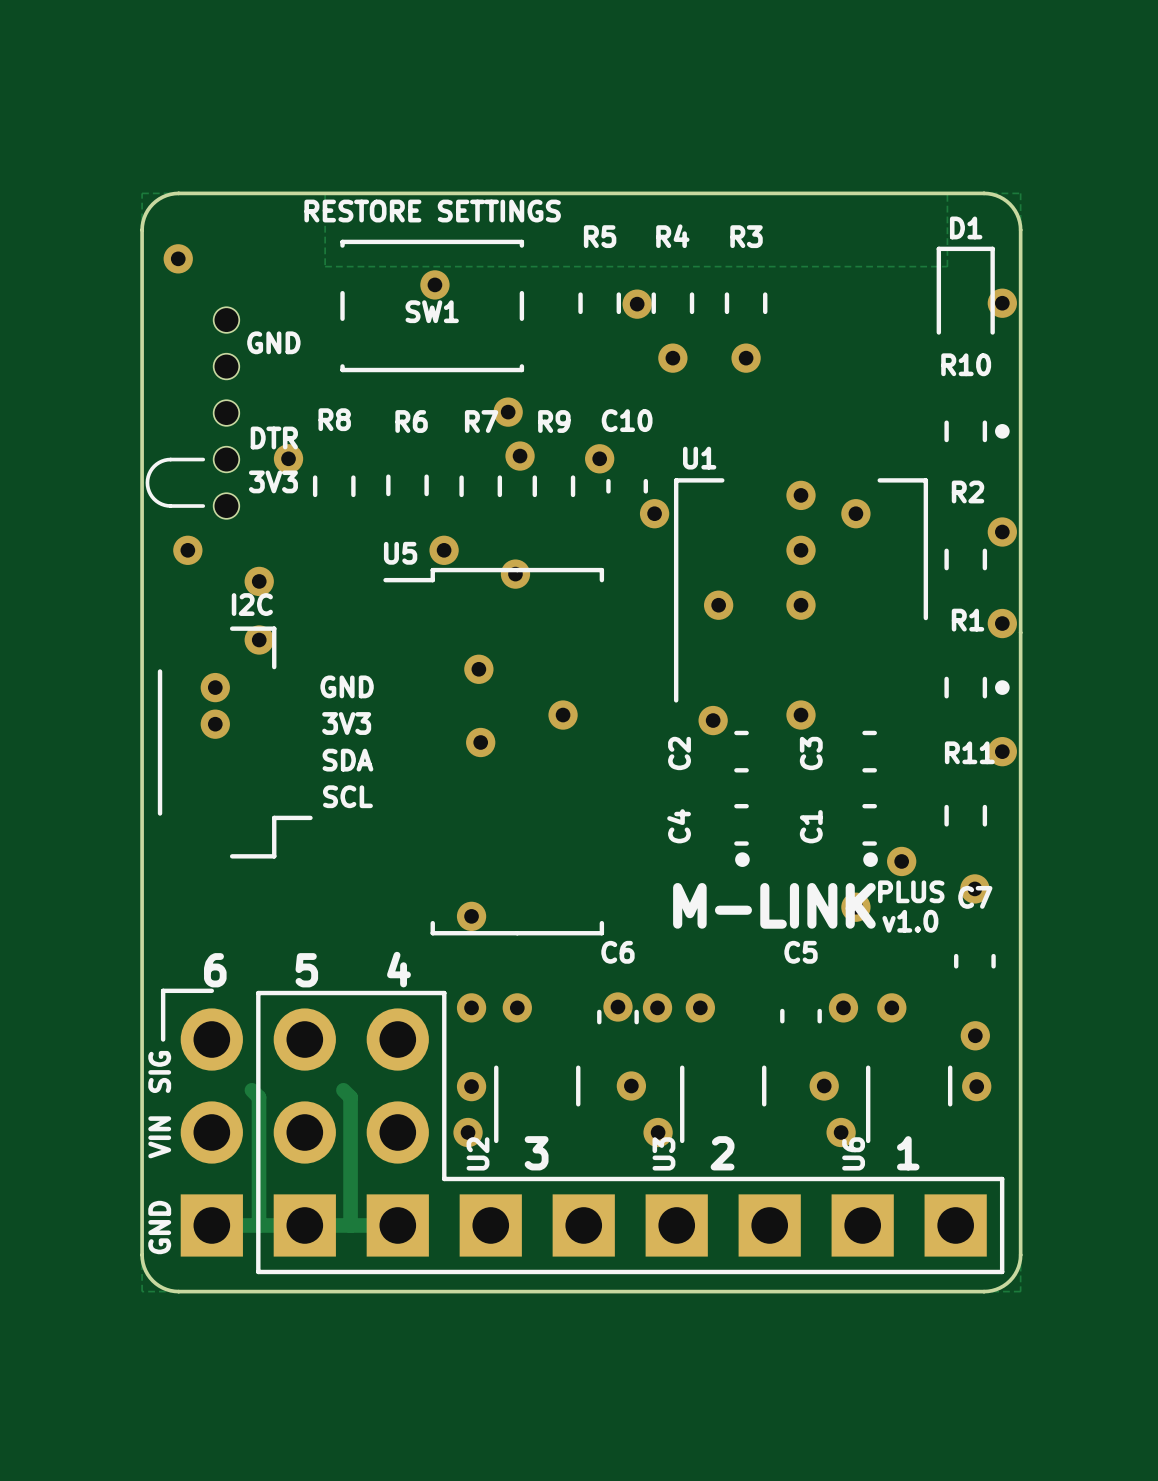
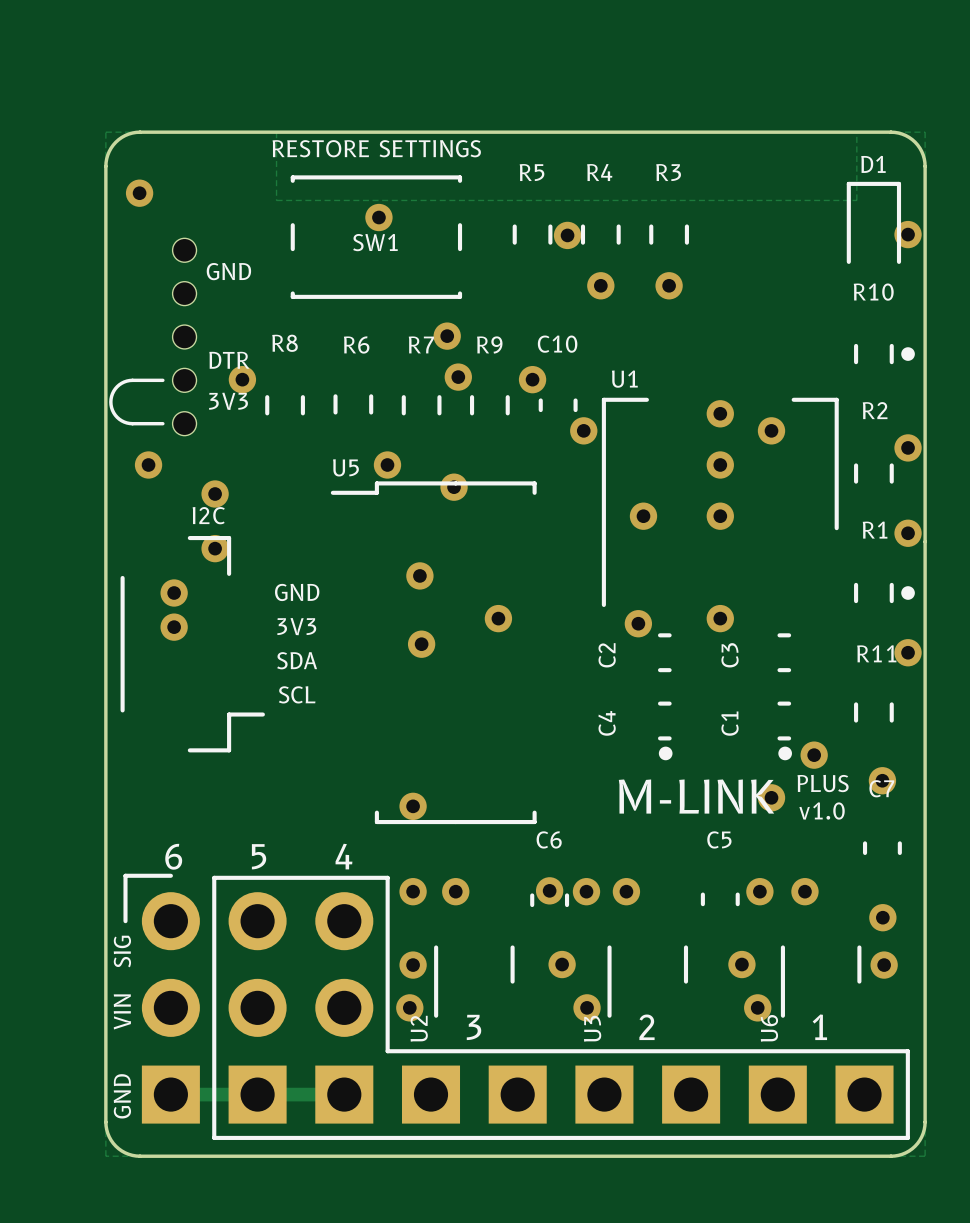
track: (251, 1090) (259, 1097) (259, 1225) -> none
track: (343, 1090) (350, 1097) (350, 1225) -> none

